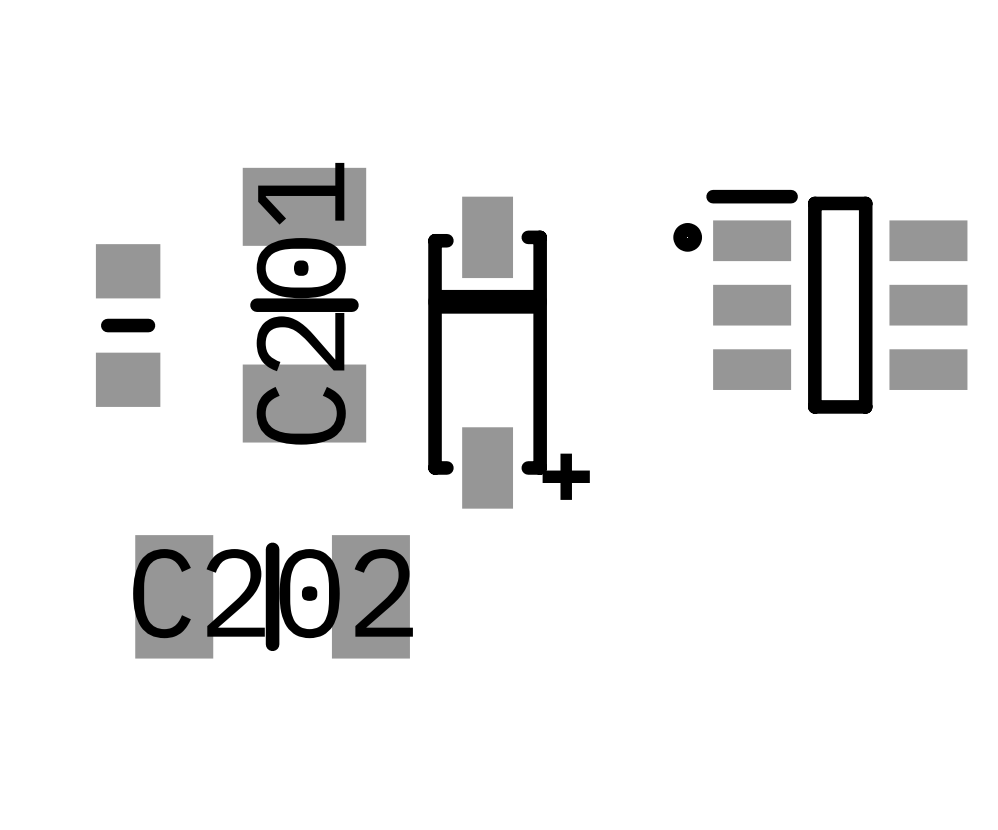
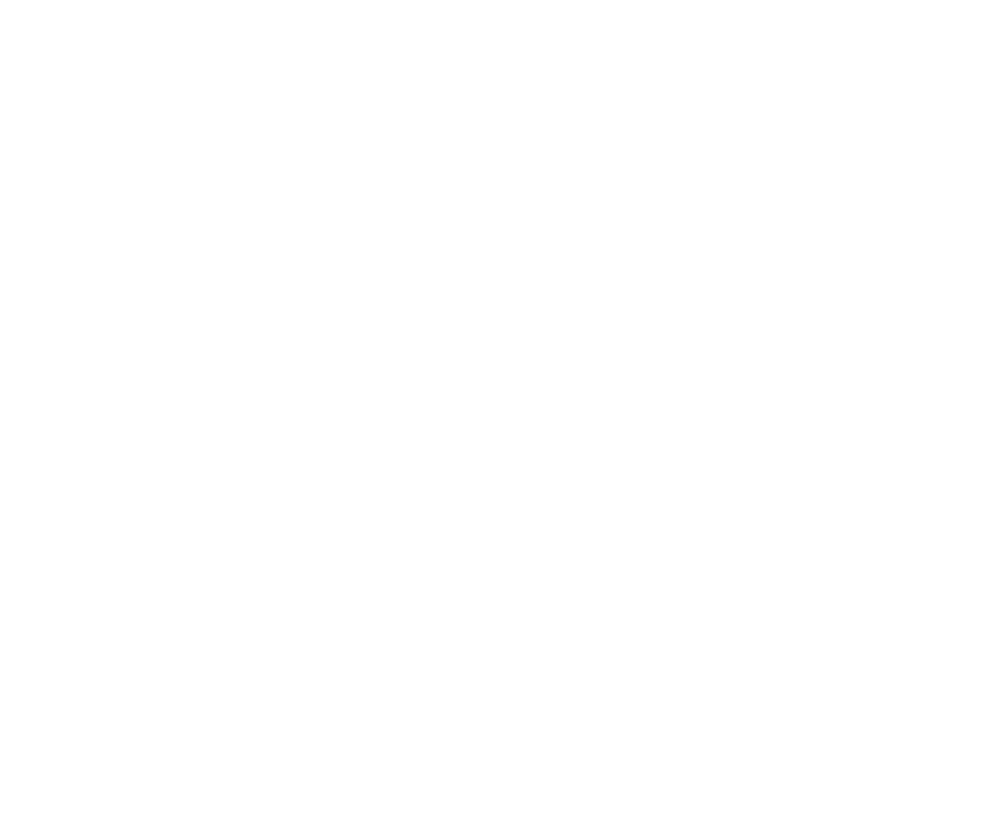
part: (820, 301) -> none
C201: (304, 305) -> none
part: (128, 325) -> none
part: (487, 352) -> none
C202: (272, 596) -> none

